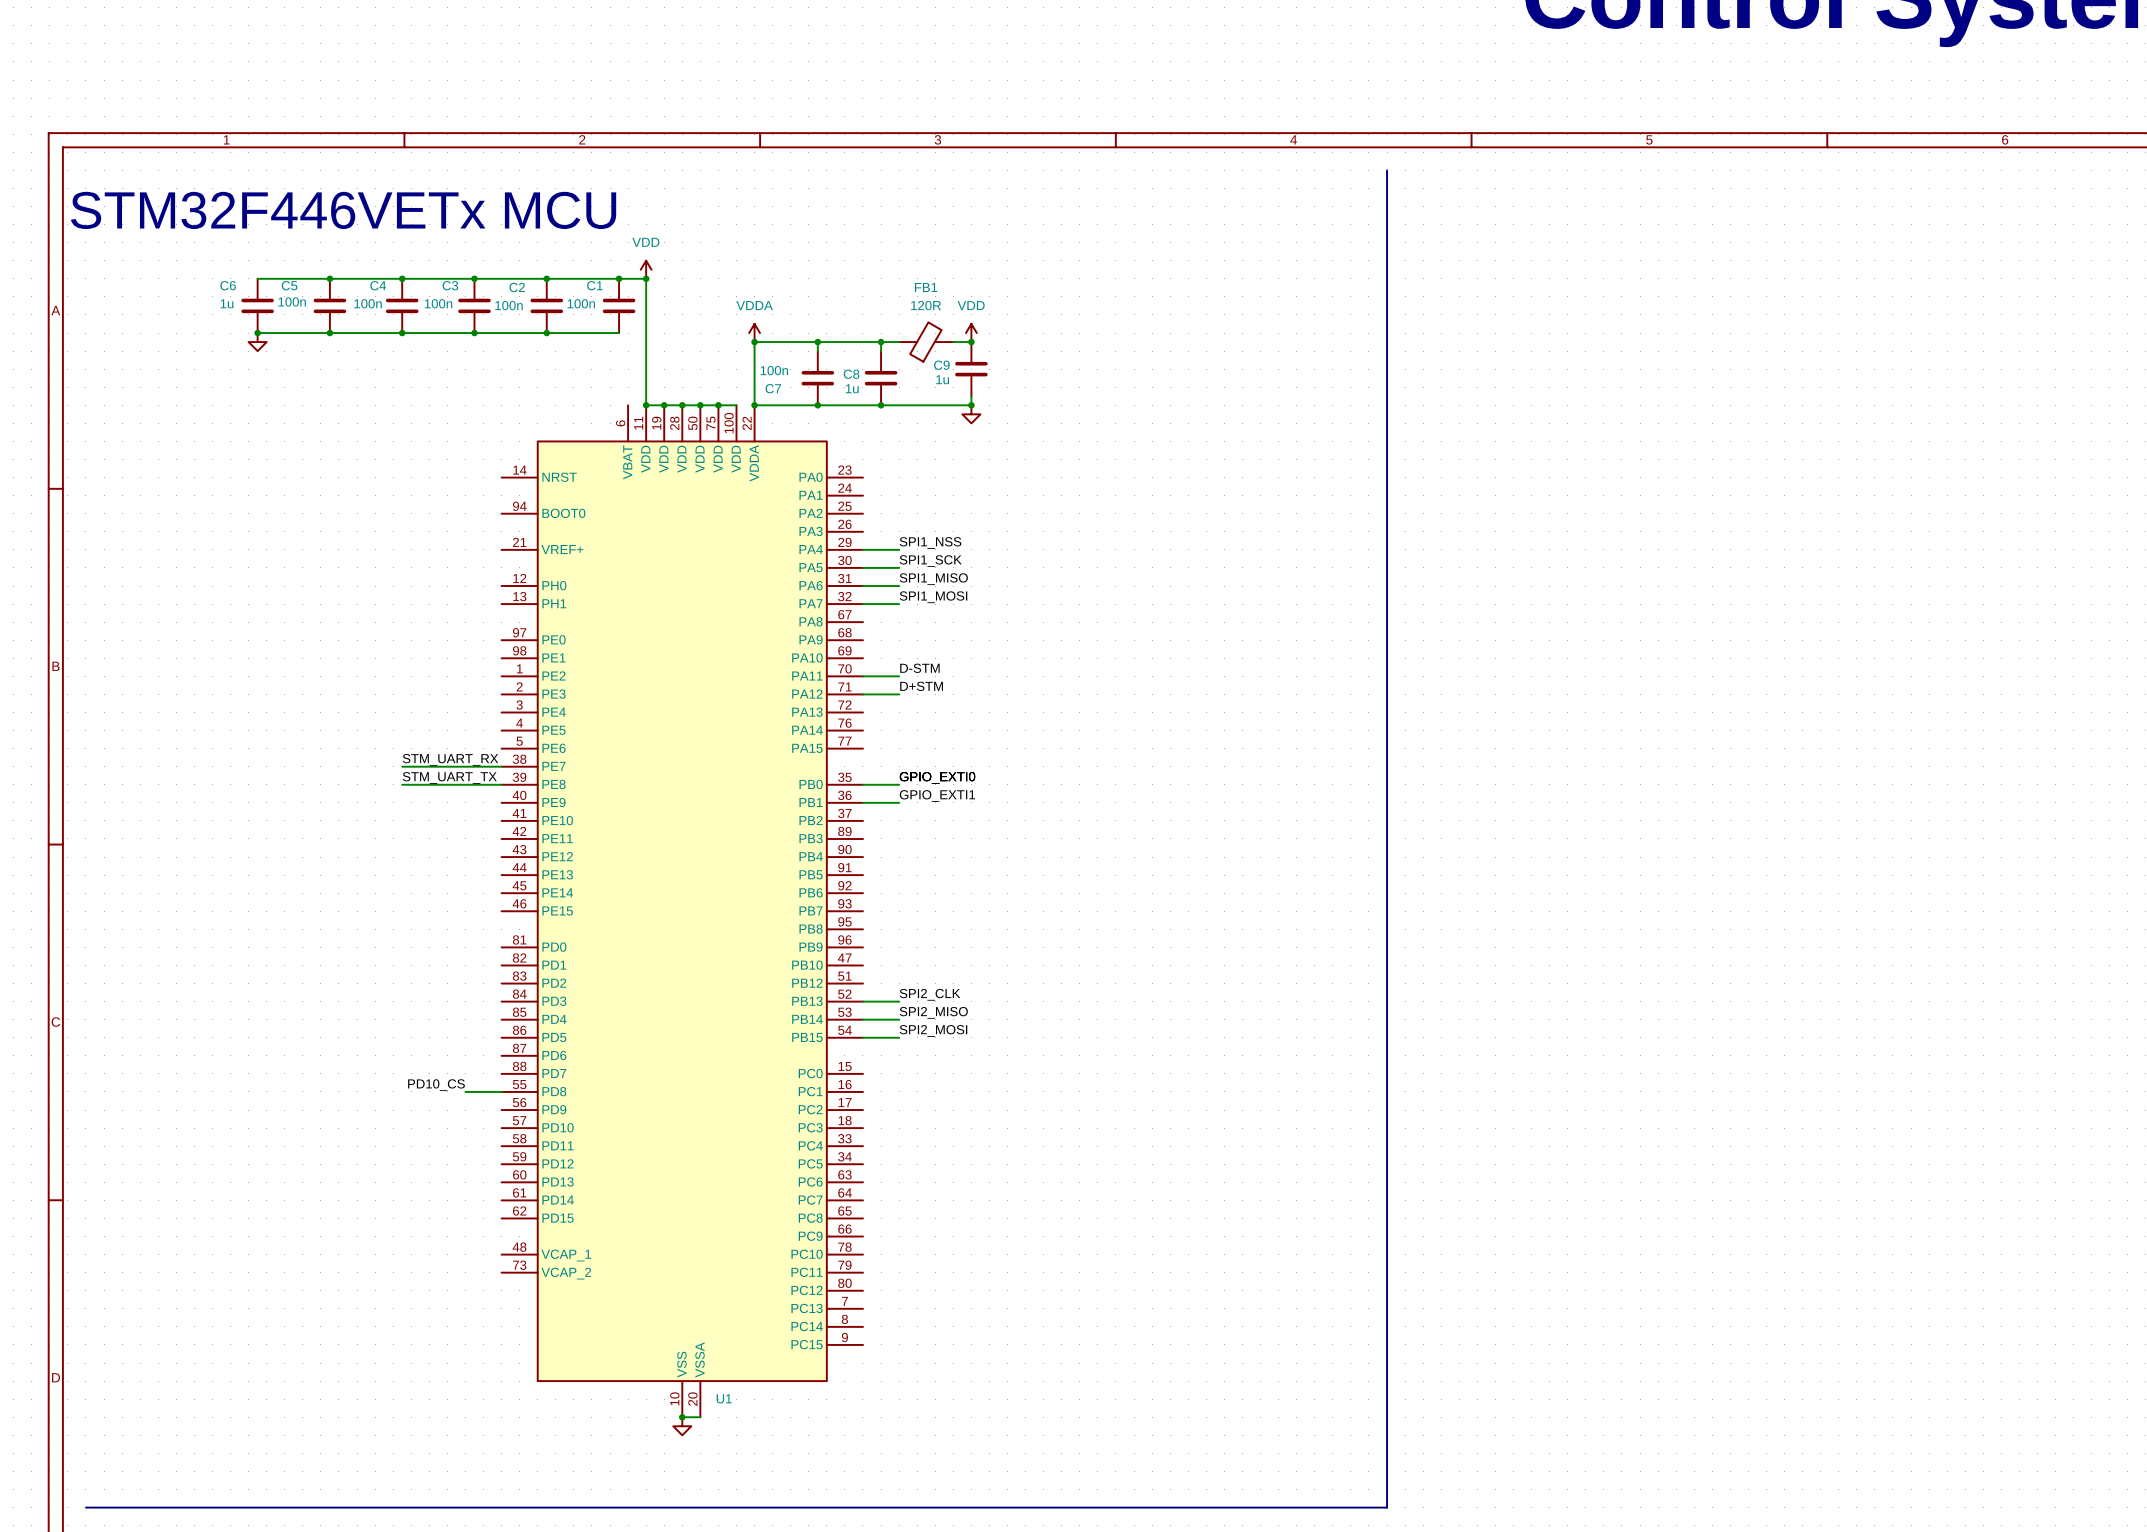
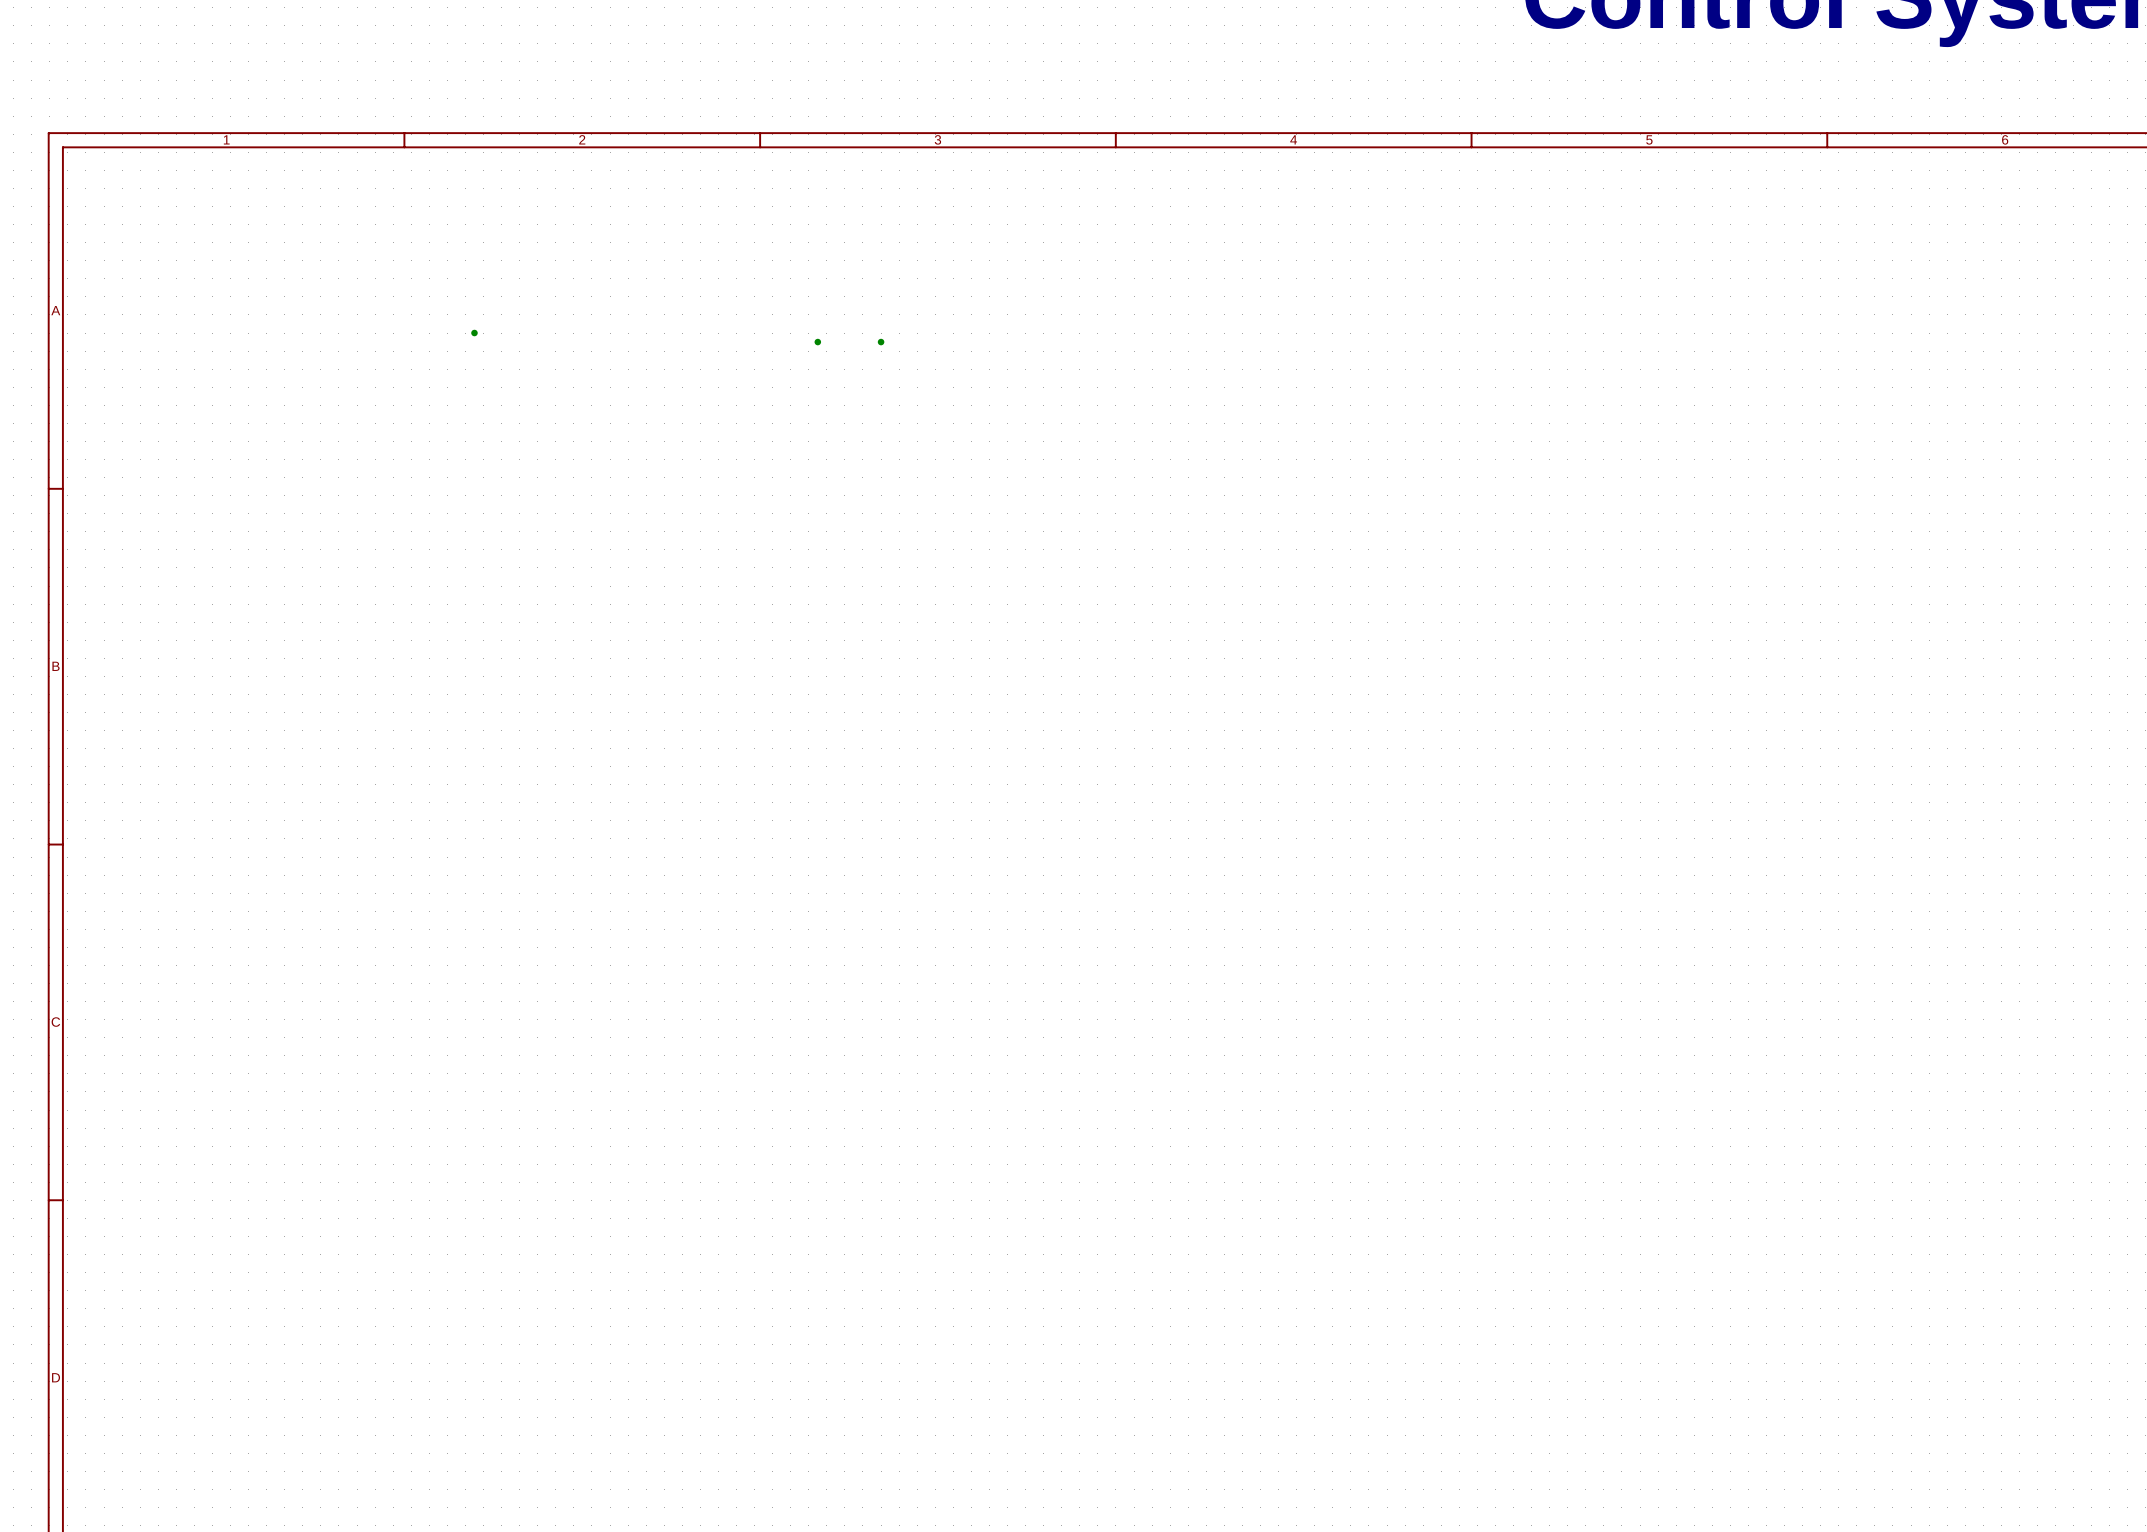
line: (1387, 170) (1387, 1507) (85, 1507) -> none
text: STM32F446VETx MCU (343, 210) -> none
power symbol: VDD (646, 269) -> none
wire: (257, 278) (646, 278) (646, 405) (736, 405) -> none
junction: (329, 278) -> none
junction: (402, 278) -> none
junction: (474, 278) -> none
junction: (546, 278) -> none
junction: (619, 278) -> none
junction: (646, 278) -> none
C6: 1u (257, 305) -> none
C5: 100n (329, 305) -> none
C4: 100n (402, 305) -> none
C3: 100n (474, 305) -> none
C2: 100n (546, 305) -> none
C1: 100n (619, 305) -> none
wire: (257, 333) (619, 333) -> none
junction: (257, 333) -> none
junction: (329, 333) -> none
junction: (402, 333) -> none
junction: (546, 333) -> none
power symbol: VDDA (754, 333) -> none
power symbol: VDD (971, 333) -> none
power symbol: (257, 342) -> none
junction: (754, 342) -> none
wire: (817, 342) (817, 351) -> none
wire: (881, 342) (881, 351) -> none
wire: (899, 342) (754, 342) (754, 405) (971, 405) (971, 396) -> none
FB1: 120R (926, 342) -> none
wire: (953, 342) (971, 342) -> none
junction: (971, 342) -> none
C9: 1u (971, 369) -> none
C7: 100n (817, 378) -> none
C8: 1u (881, 378) -> none
junction: (646, 405) -> none
junction: (664, 405) -> none
junction: (682, 405) -> none
junction: (700, 405) -> none
junction: (718, 405) -> none
junction: (754, 405) -> none
junction: (817, 405) -> none
junction: (881, 405) -> none
junction: (971, 405) -> none
power symbol: (971, 414) -> none
label: SPI1_NSS (930, 543) -> none
wire: (862, 549) (899, 549) -> none
label: SPI1_SCK (930, 561) -> none
wire: (862, 567) (899, 567) -> none
label: SPI1_MISO (933, 579) -> none
wire: (862, 586) (899, 586) -> none
label: SPI1_MOSI (933, 597) -> none
wire: (862, 604) (899, 604) -> none
label: D-STM (919, 668) -> none
wire: (862, 676) (899, 676) -> none
label: D+STM (921, 686) -> none
wire: (862, 694) (899, 694) -> none
label: STM_UART_RX (450, 759) -> none
wire: (402, 766) (501, 766) -> none
label: STM_UART_TX (449, 777) -> none
label: GPIO_EXTI0 (937, 777) -> none
wire: (402, 784) (501, 784) -> none
wire: (862, 784) (899, 784) -> none
label: GPIO_EXTI1 (937, 796) -> none
wire: (862, 802) (899, 802) -> none
U1: (682, 911) -> none
label: SPI2_CLK (930, 994) -> none
wire: (862, 1001) (899, 1001) -> none
label: SPI2_MISO (933, 1012) -> none
wire: (862, 1019) (899, 1019) -> none
label: SPI2_MOSI (933, 1030) -> none
wire: (862, 1037) (899, 1037) -> none
label: PD10_CS (436, 1085) -> none
wire: (465, 1091) (501, 1091) -> none
wire: (682, 1417) (700, 1417) -> none
junction: (682, 1417) -> none
power symbol: (682, 1426) -> none

